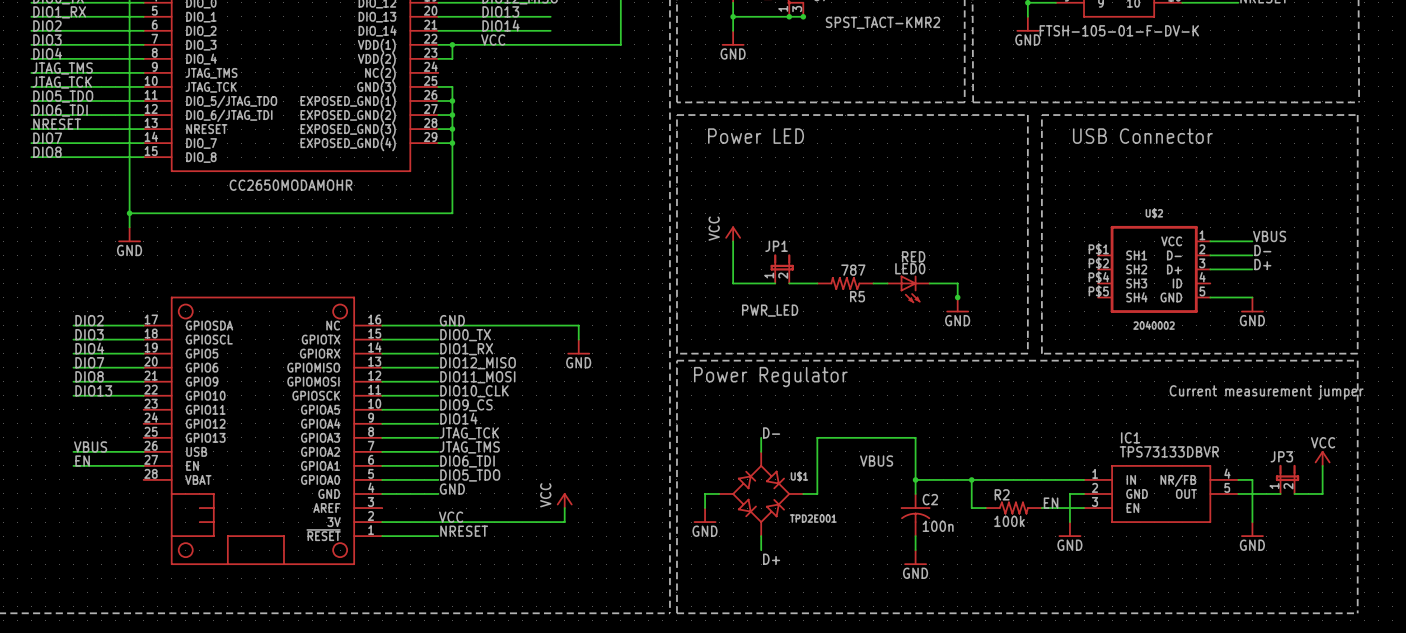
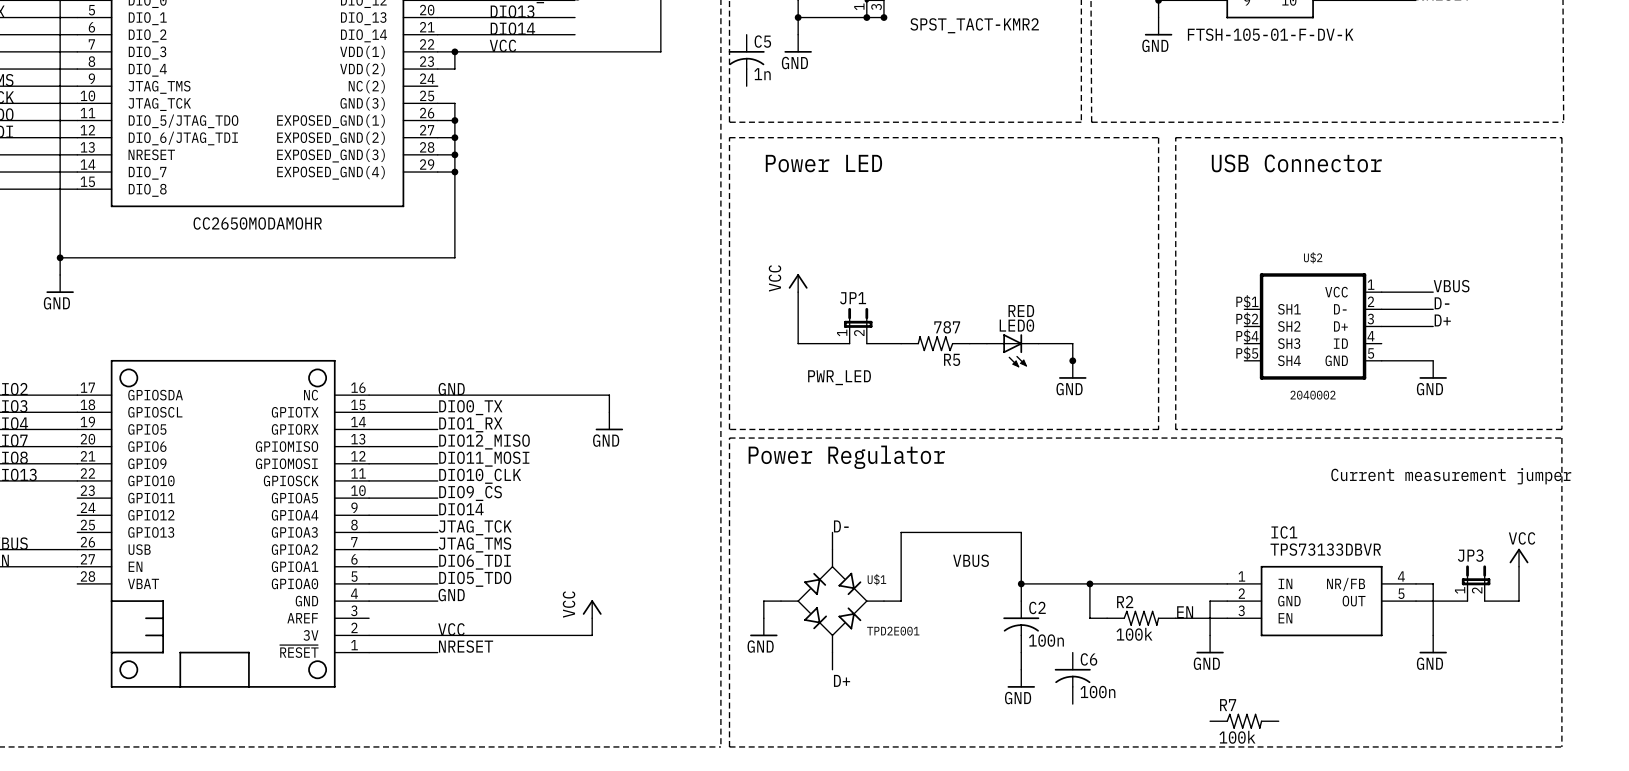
C5: none -> 1n (746, 60)
C6: none -> 100n (1072, 678)
R7: none -> 100k (1244, 721)

